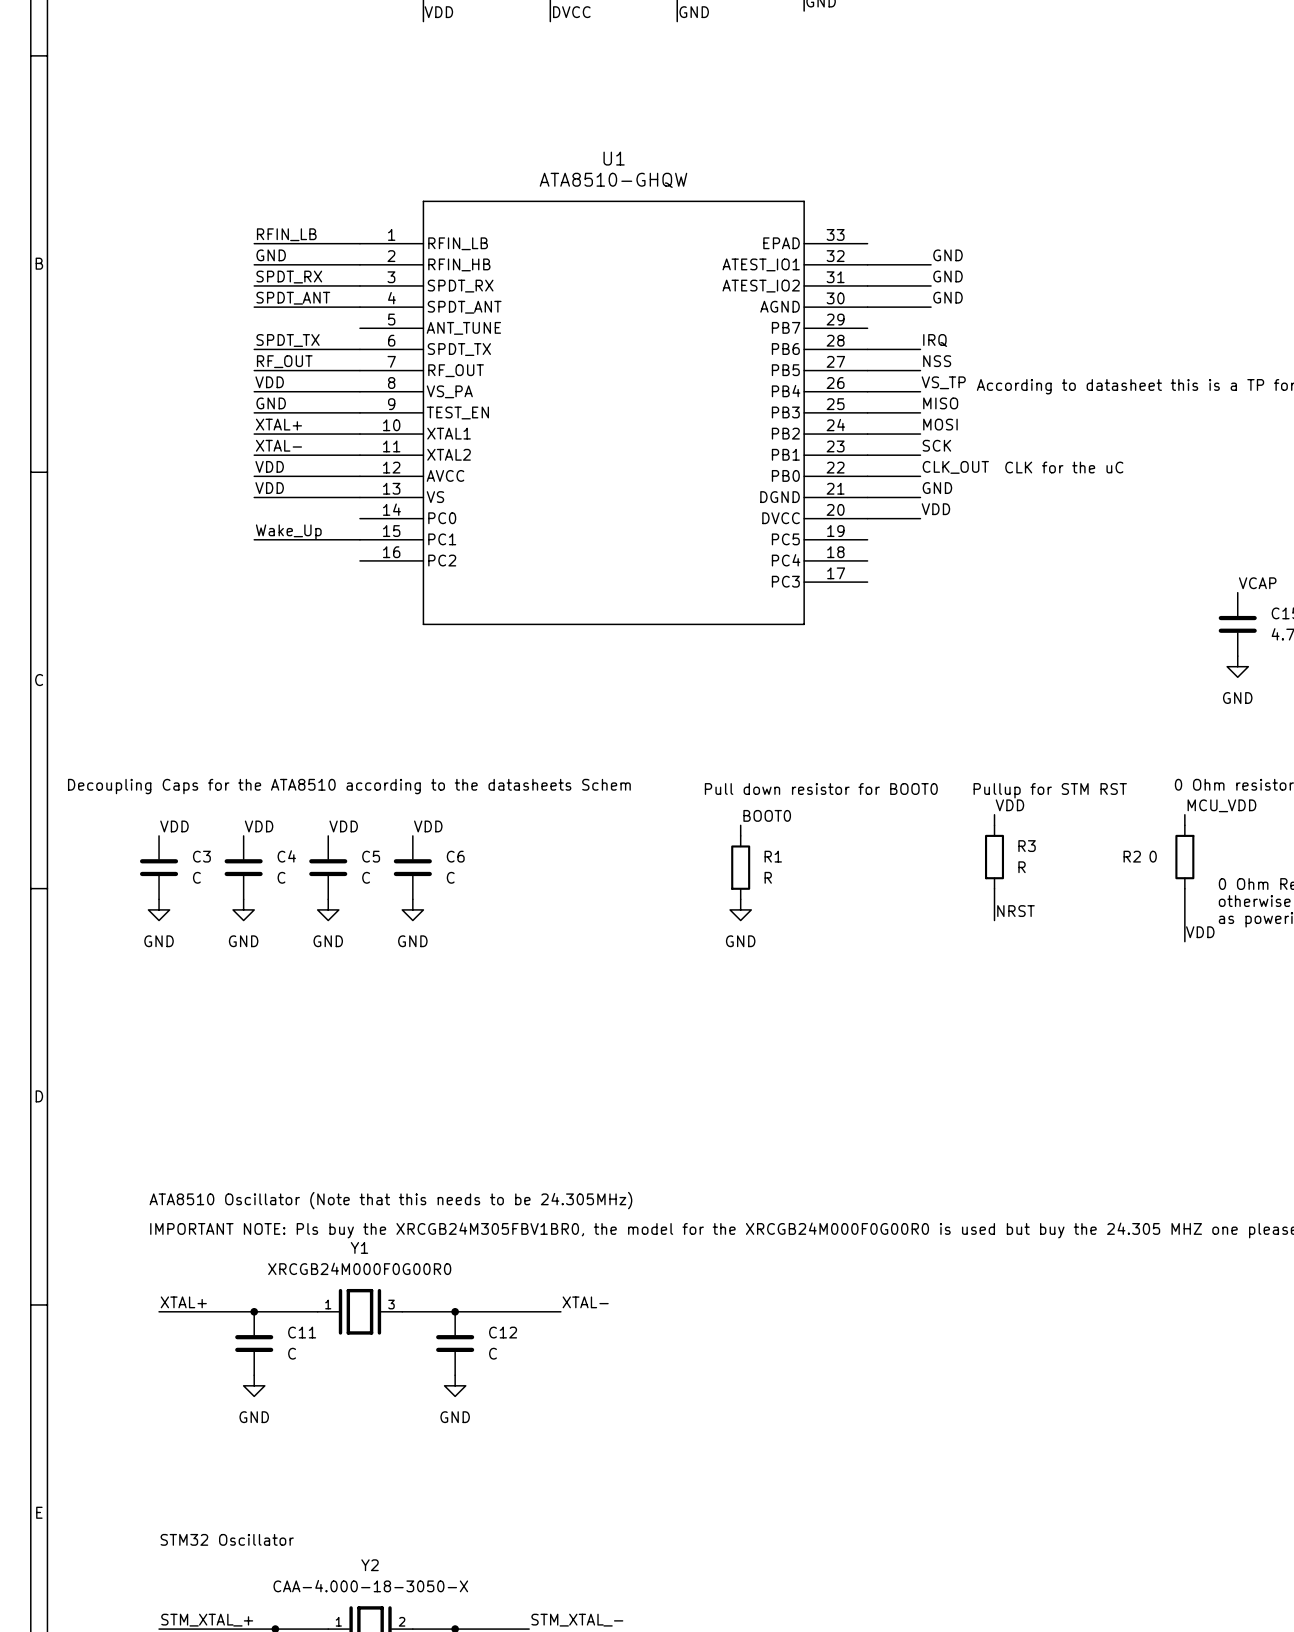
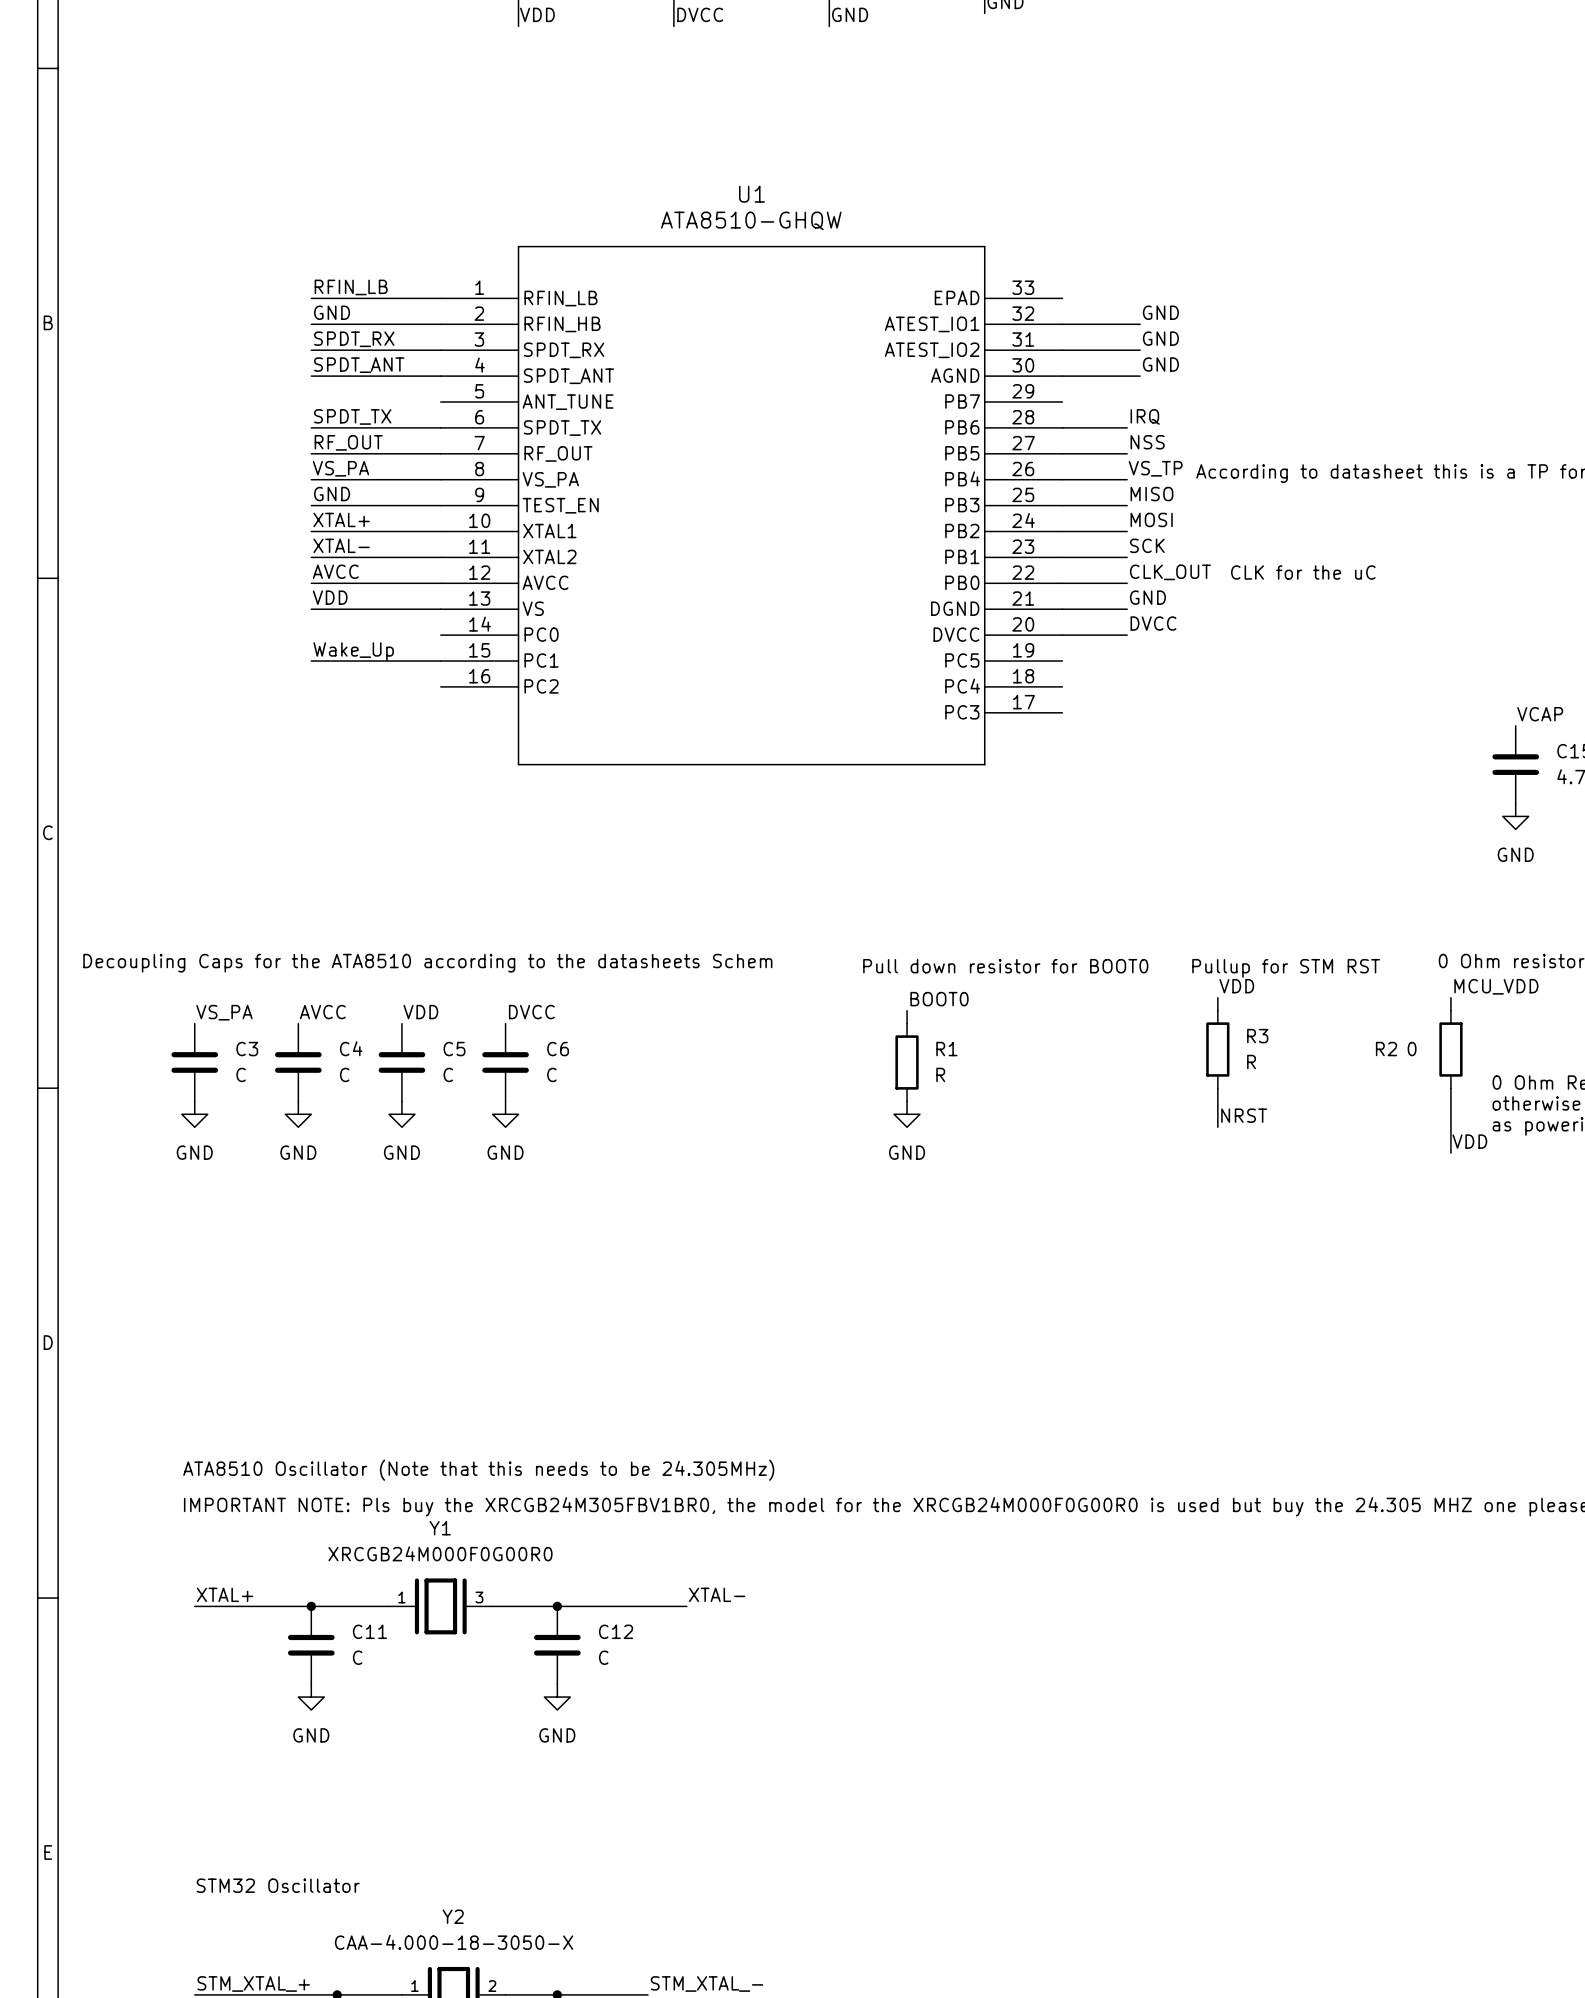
label: VDD (269, 382) -> VS_PA (341, 468)
label: VDD (269, 466) -> AVCC (335, 571)
label: VDD (935, 509) -> DVCC (1153, 623)
label: VDD (174, 826) -> VS_PA (224, 1012)
label: VDD (259, 826) -> AVCC (322, 1012)
label: VDD (428, 826) -> DVCC (531, 1012)

